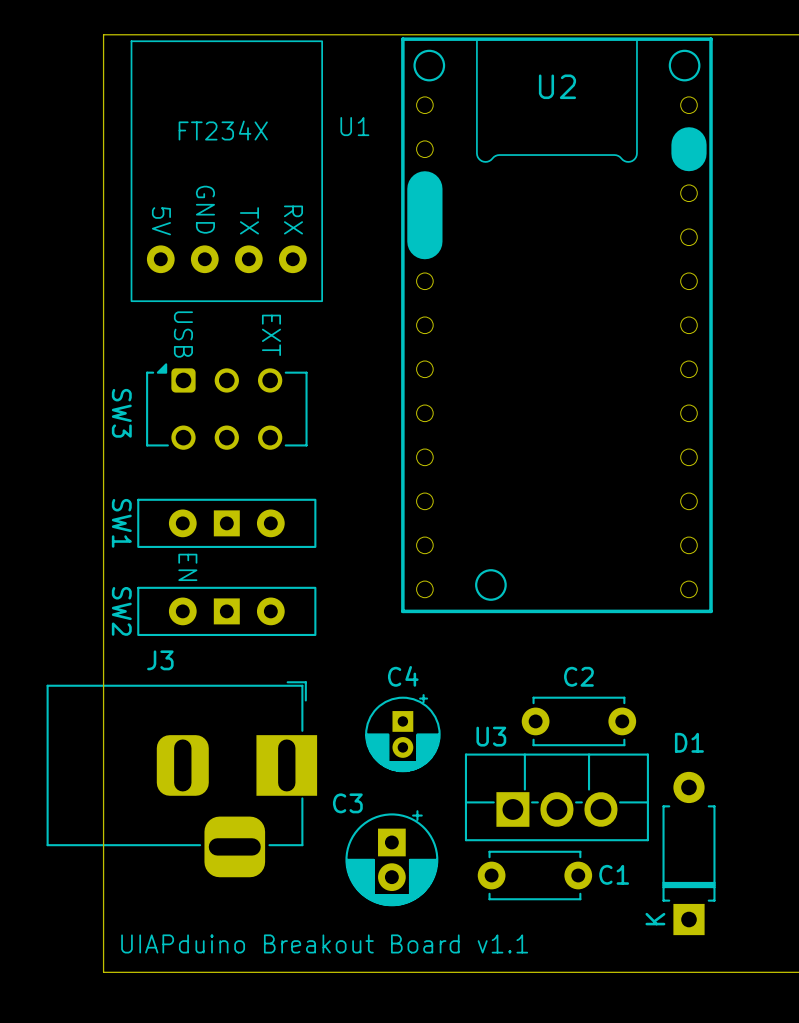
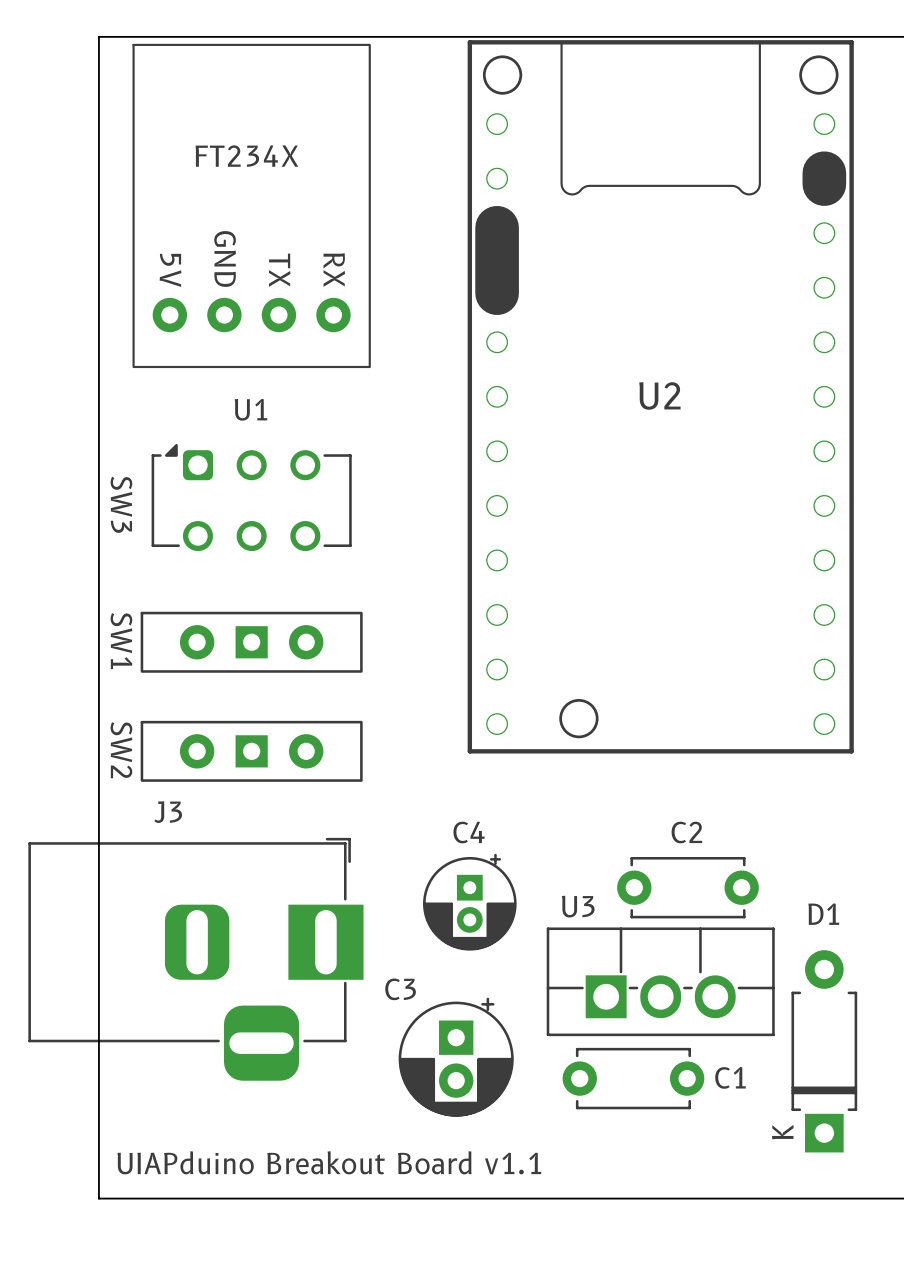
U2 name position: U2 (557, 86) -> U2 (659, 395)
U1 name position: U1 (354, 126) -> U1 (250, 409)
text: USB (183, 334) -> none
text: EXT (271, 335) -> none
text: EN (187, 567) -> none

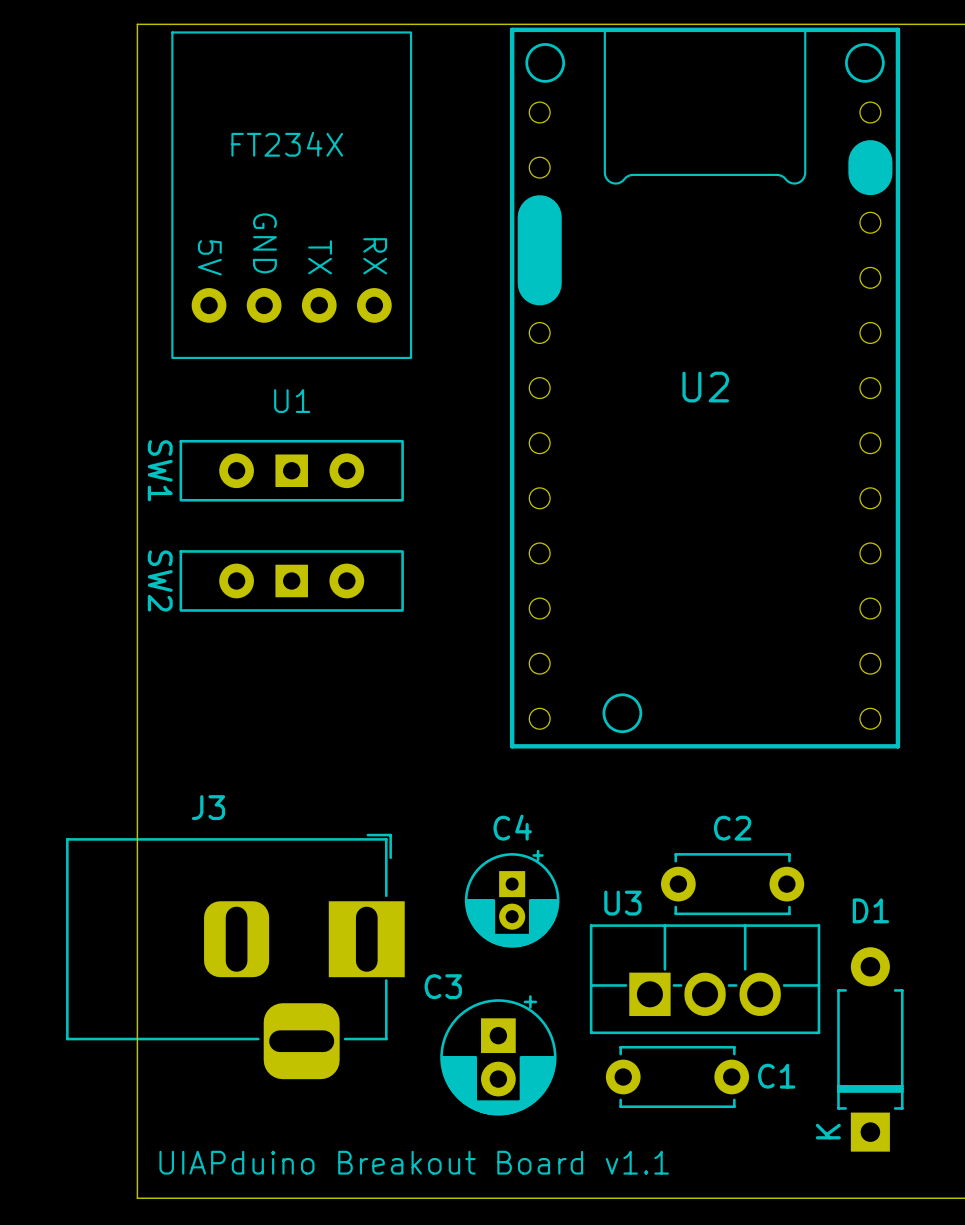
SW3: (251, 497) -> none
SW1 position: (251, 642) -> (291, 470)
SW2 position: (251, 751) -> (291, 580)

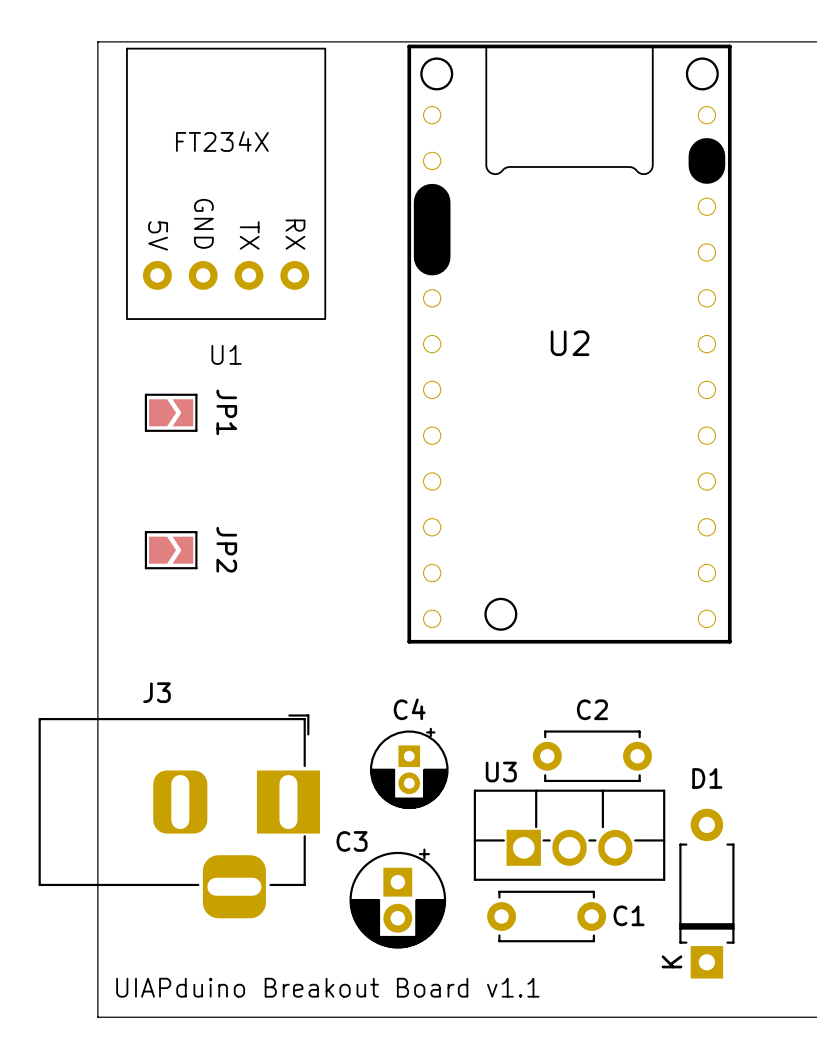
JP1: none -> (171, 412)
SW1: (291, 470) -> none
SW2: (291, 580) -> none
JP2: none -> (171, 550)

